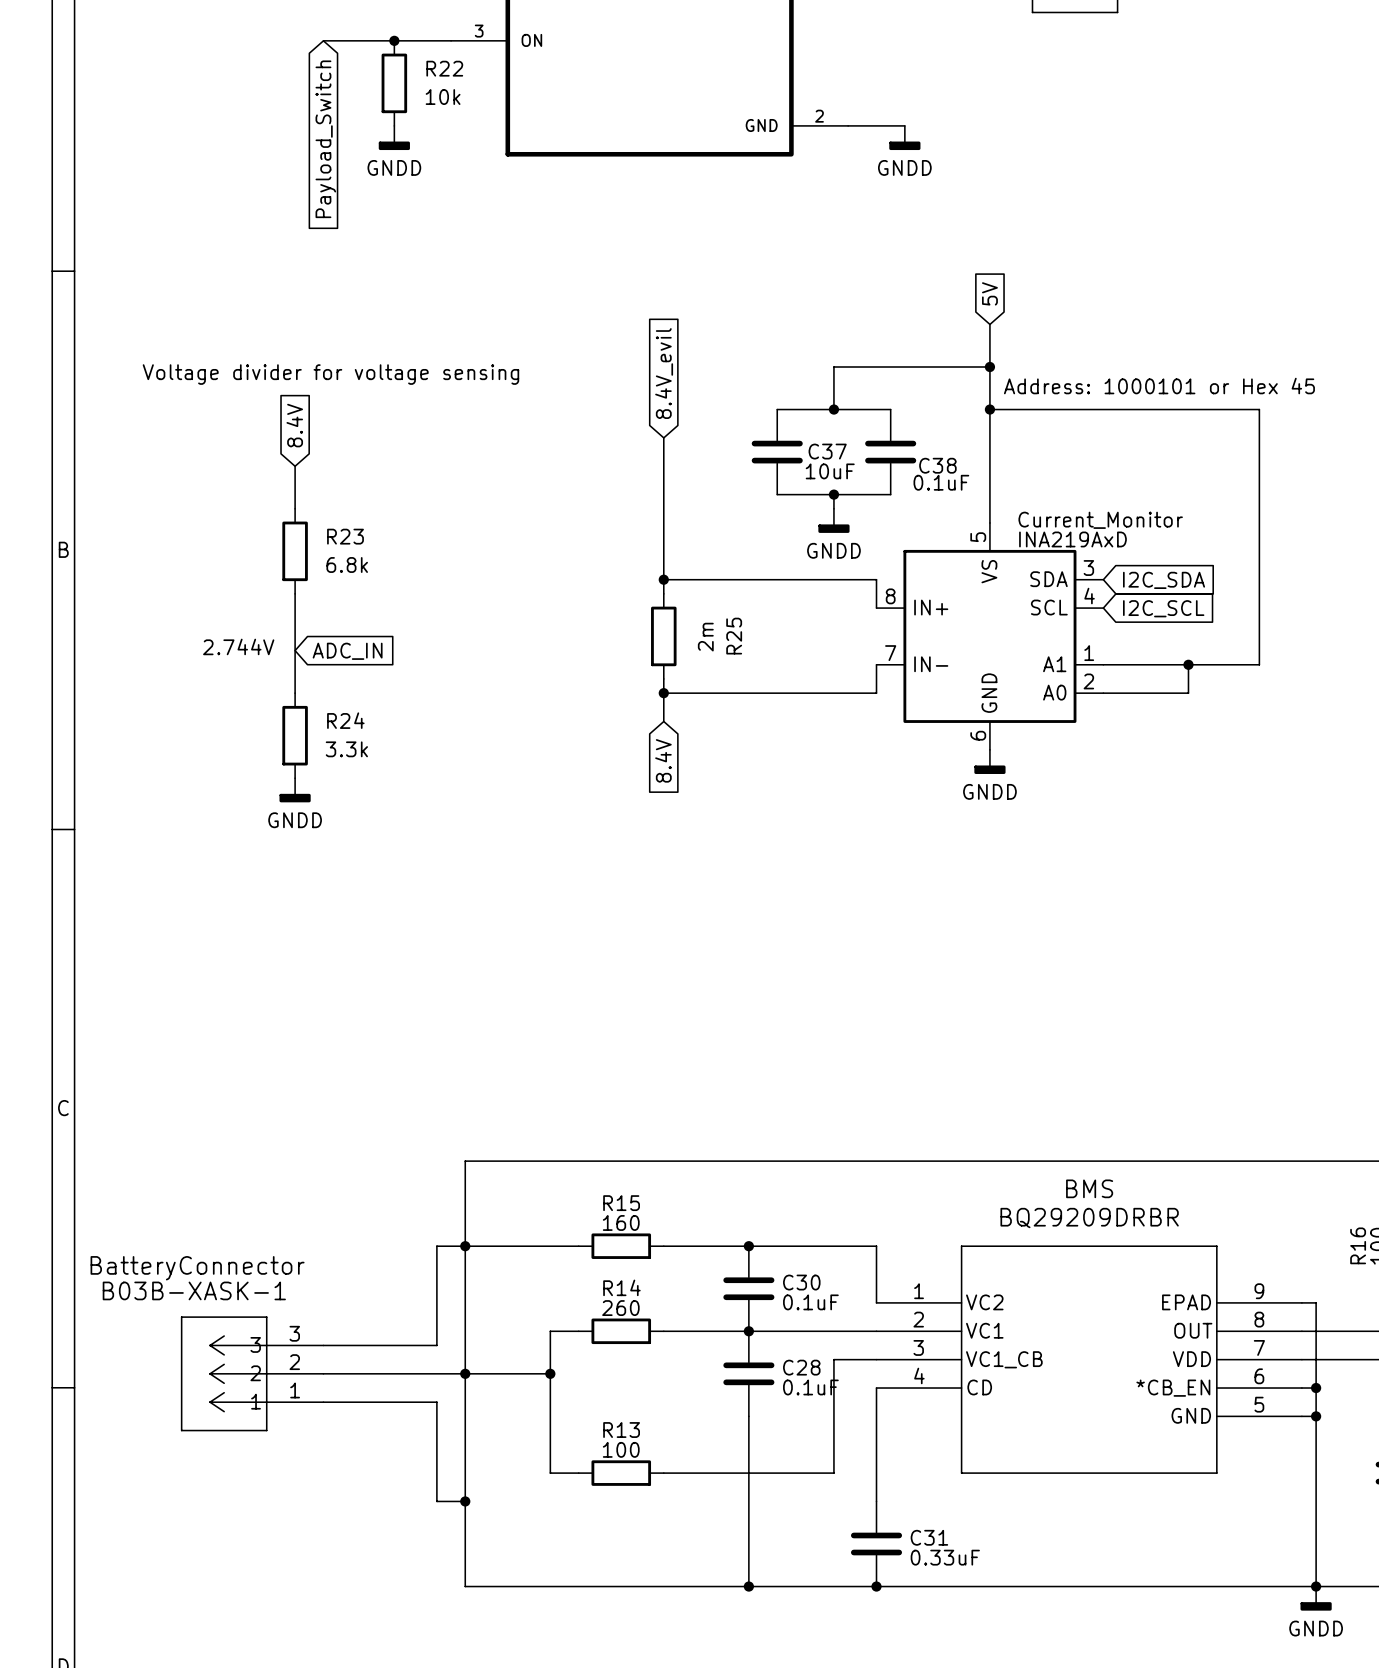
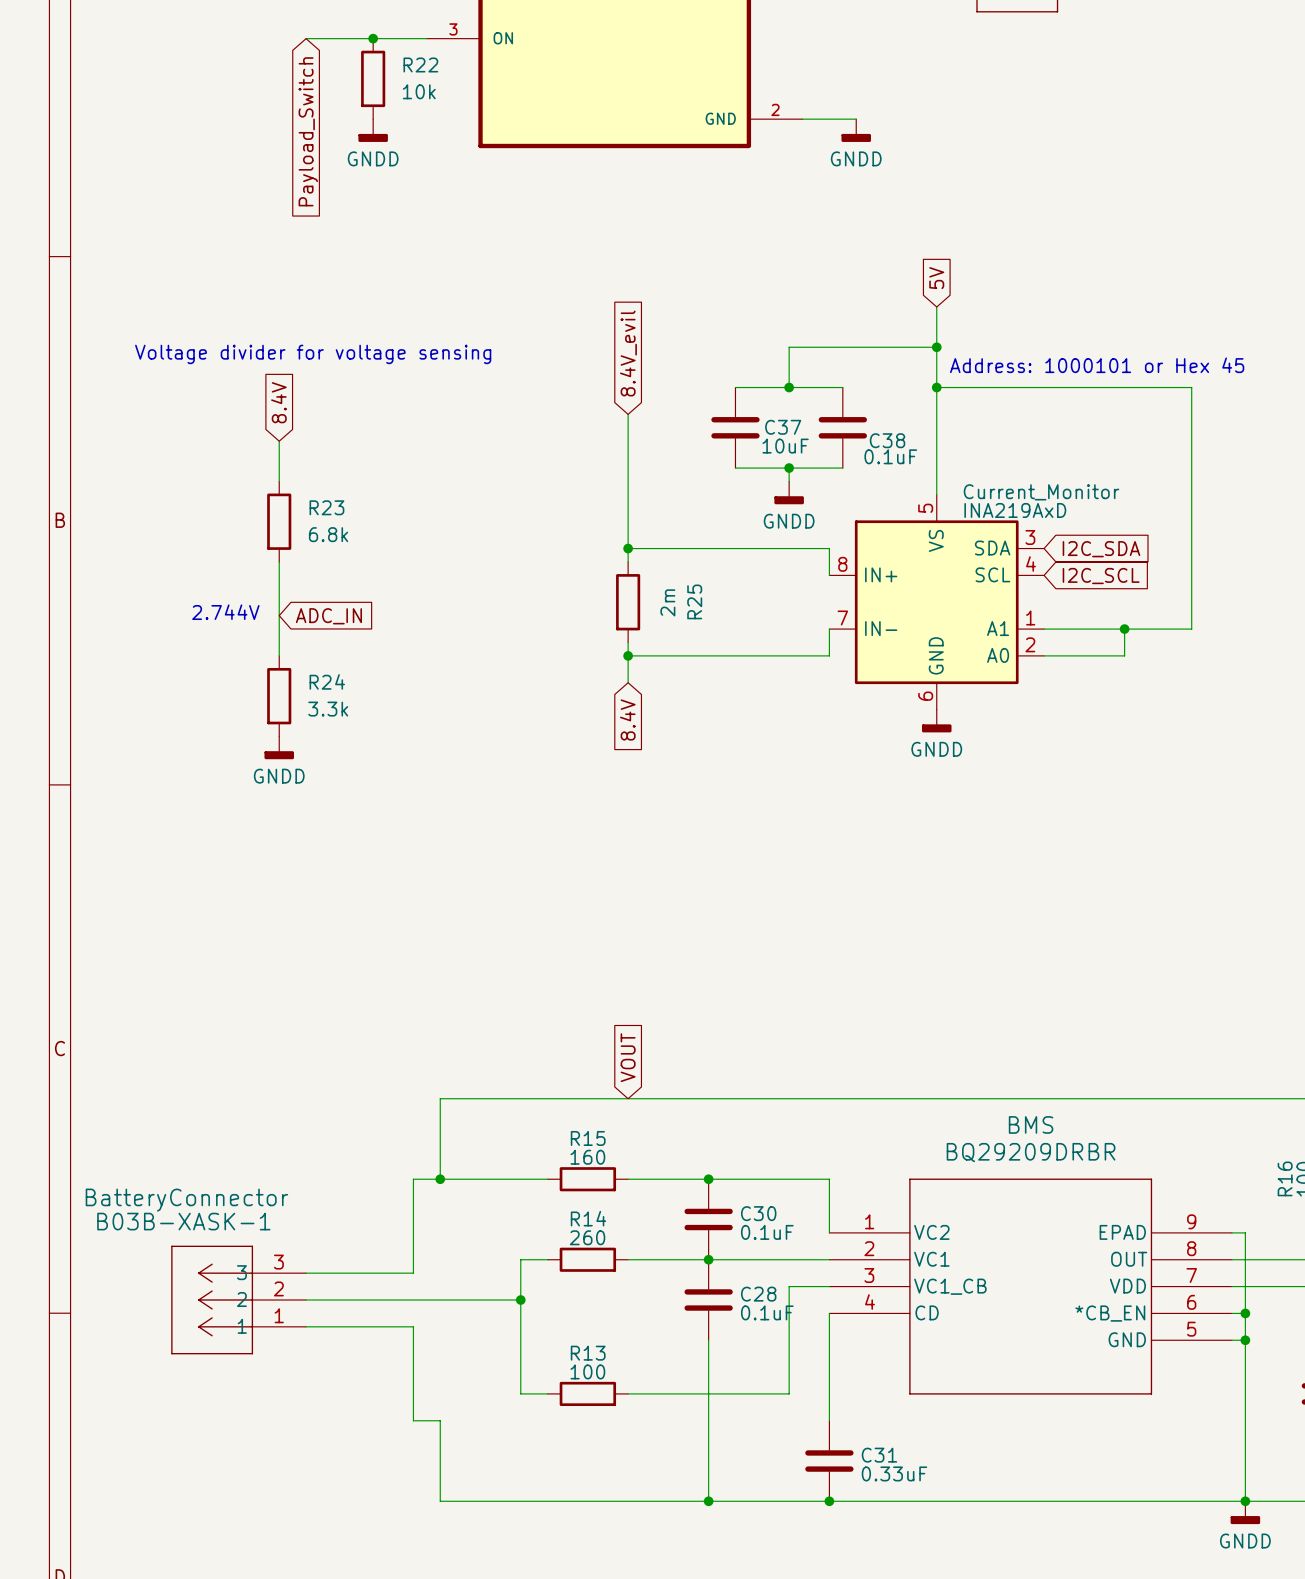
global label: none -> VOUT (628, 1057)
wire: (465, 1246) (465, 1501) -> none
junction: (465, 1373) -> none
junction: (465, 1501) -> none

